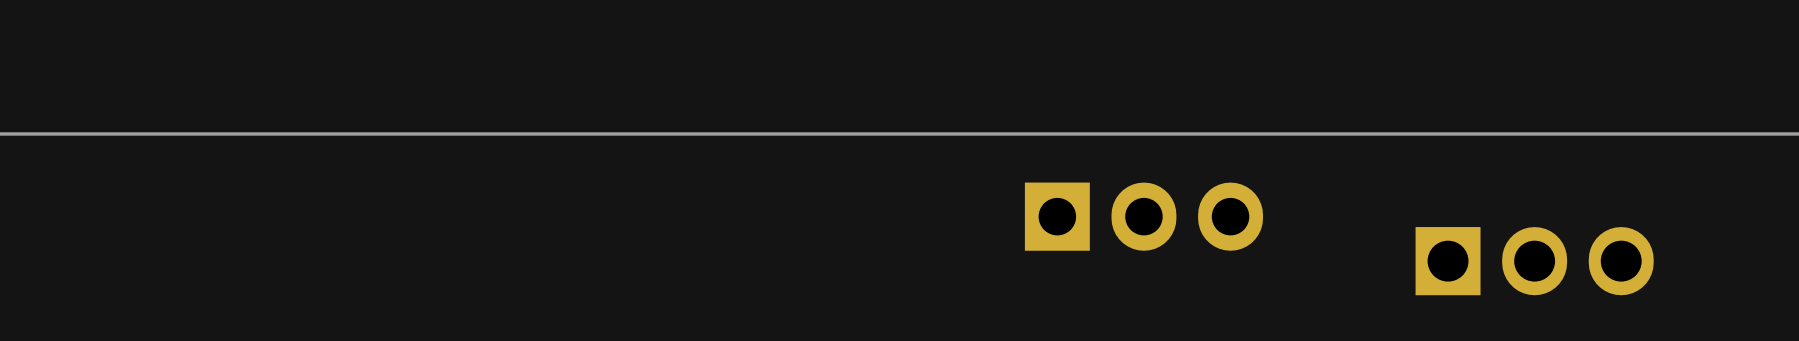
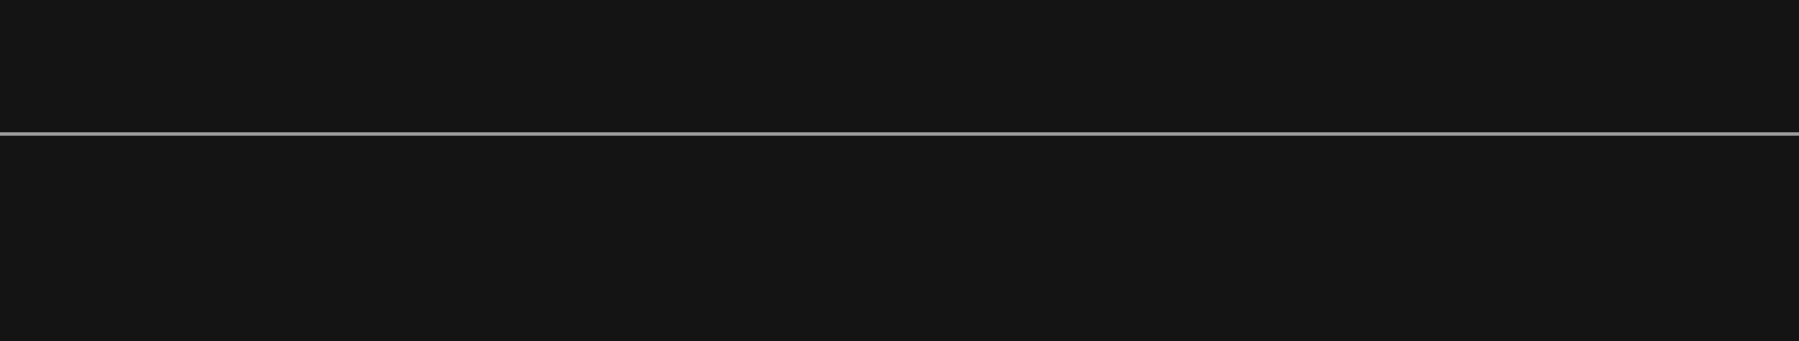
part: (1143, 216) -> none
part: (1534, 261) -> none

